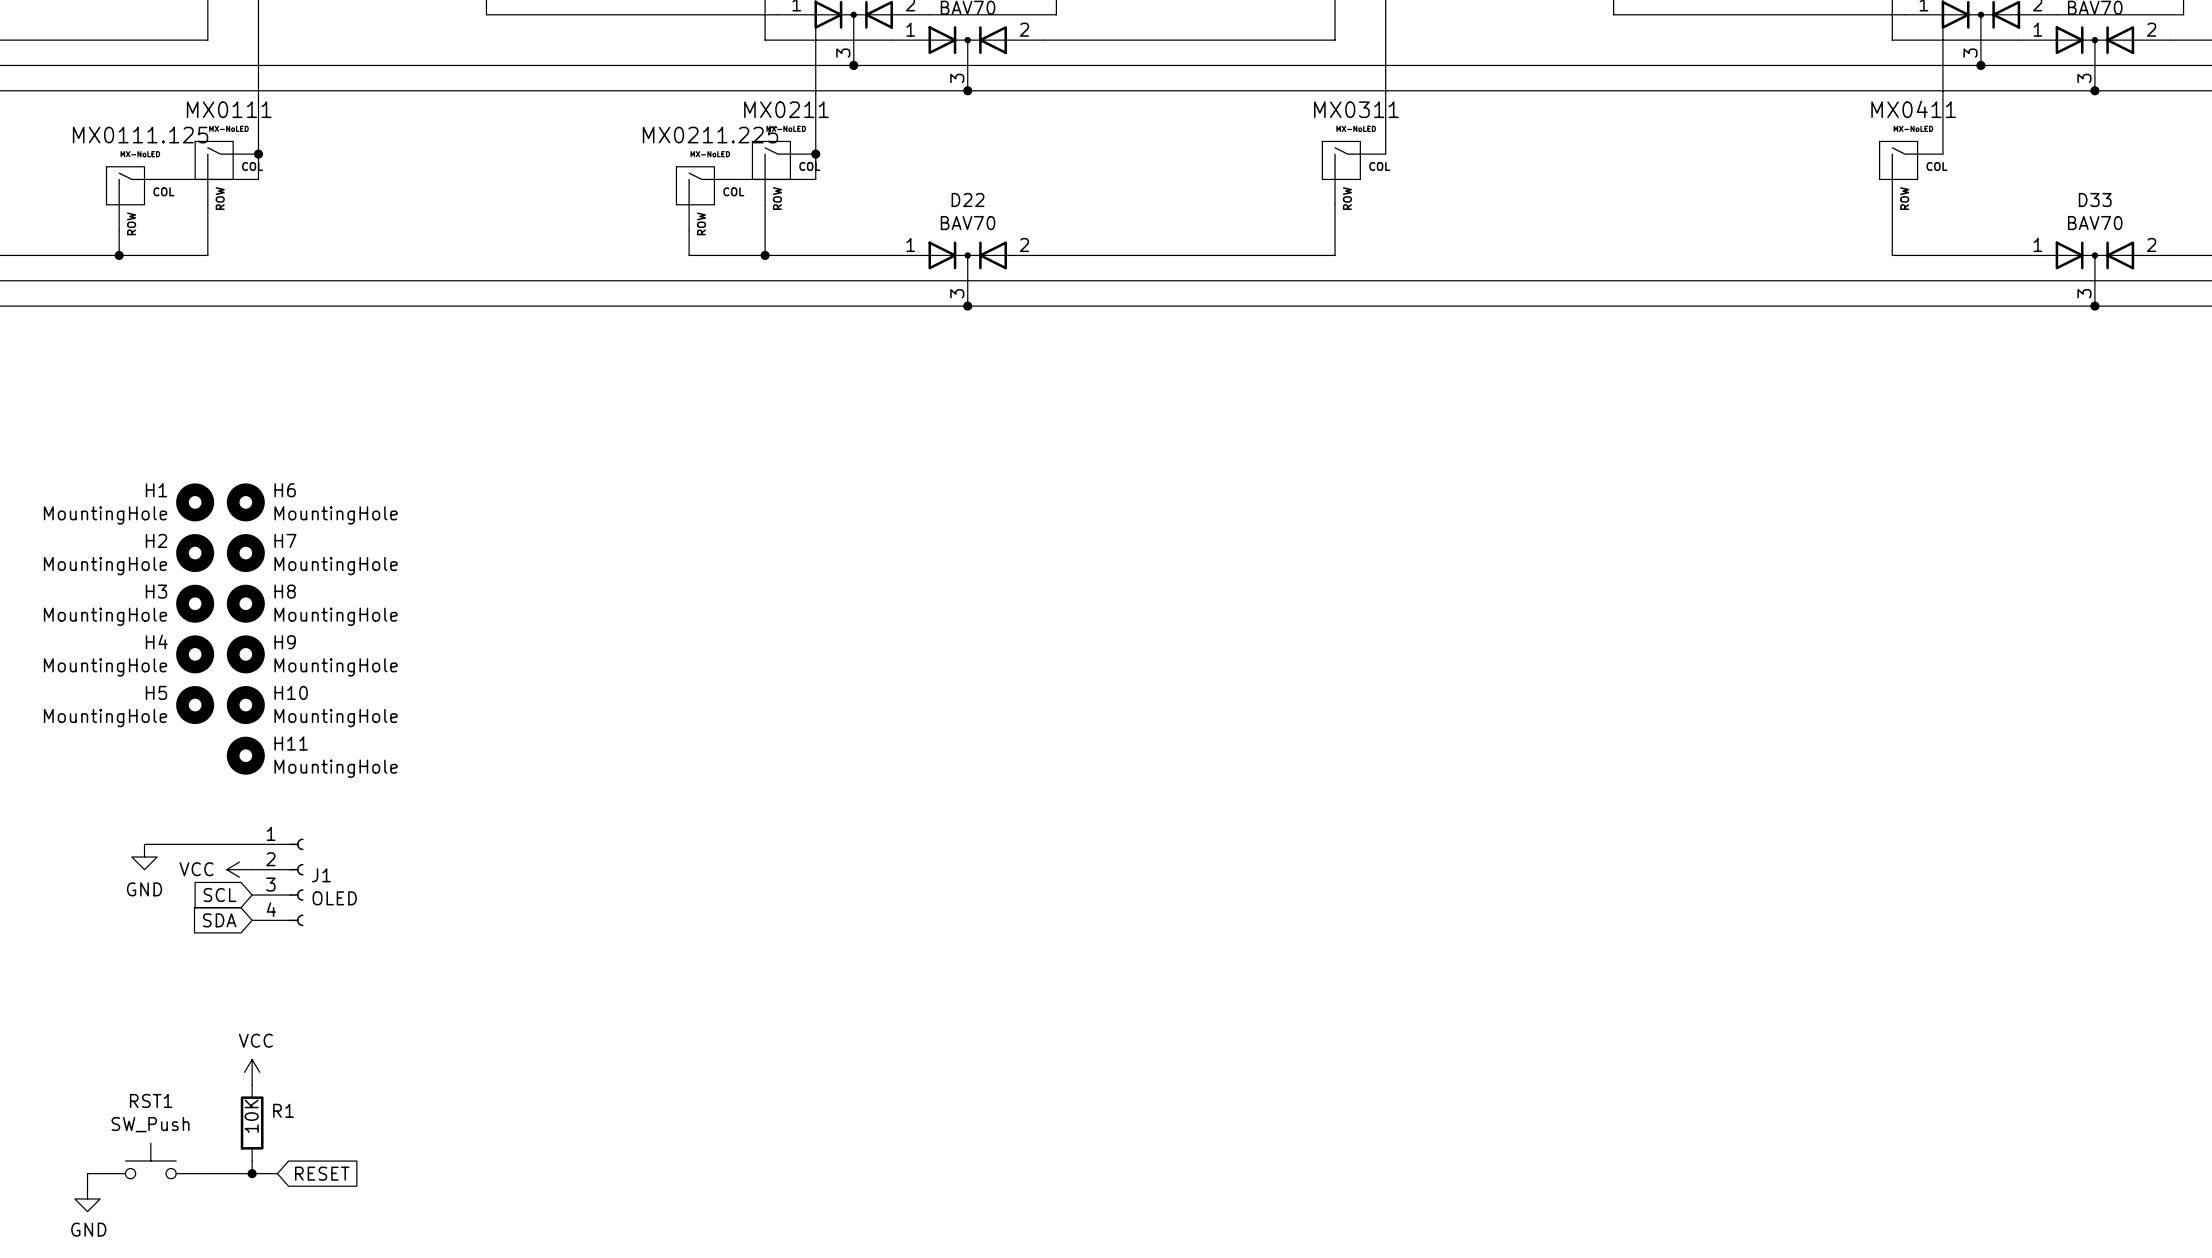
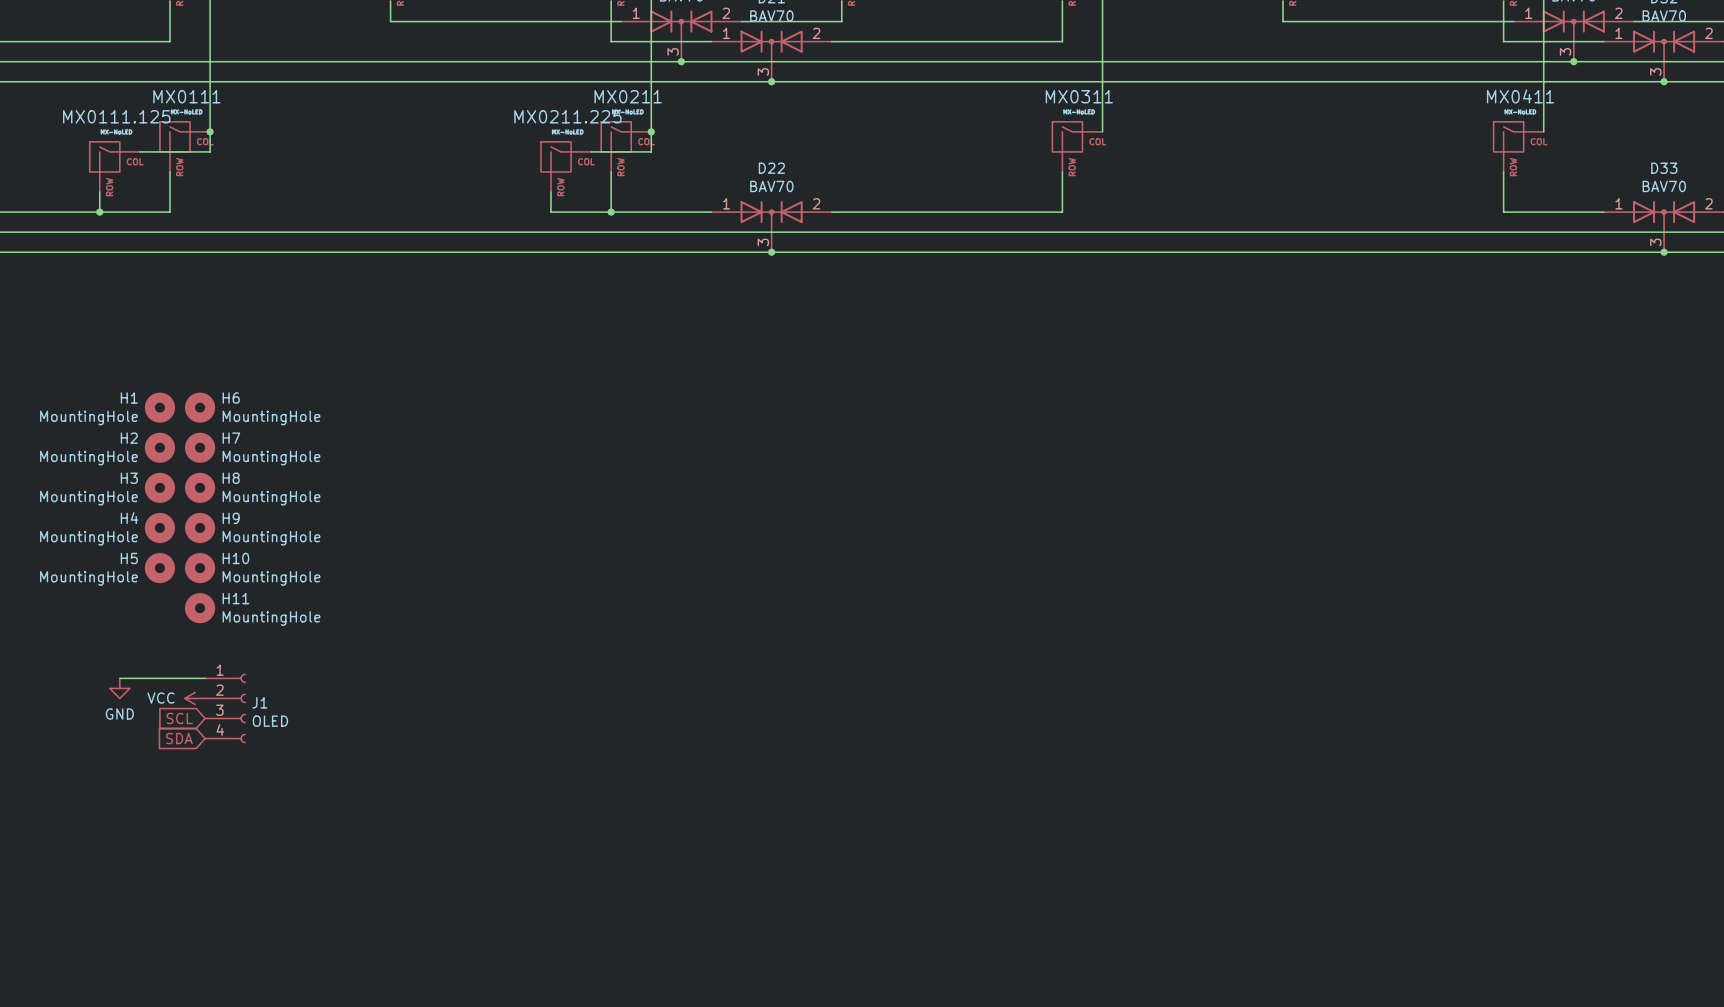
power symbol: VCC (252, 1072) -> none
R1: 10K (252, 1122) -> none
RST1: SW_Push (150, 1160) -> none
wire: (252, 1160) (252, 1173) -> none
wire: (100, 1173) (87, 1173) (87, 1186) -> none
wire: (201, 1173) (277, 1173) -> none
junction: (252, 1173) -> none
global label: RESET (322, 1173) -> none
power symbol: GND (87, 1198) -> none

